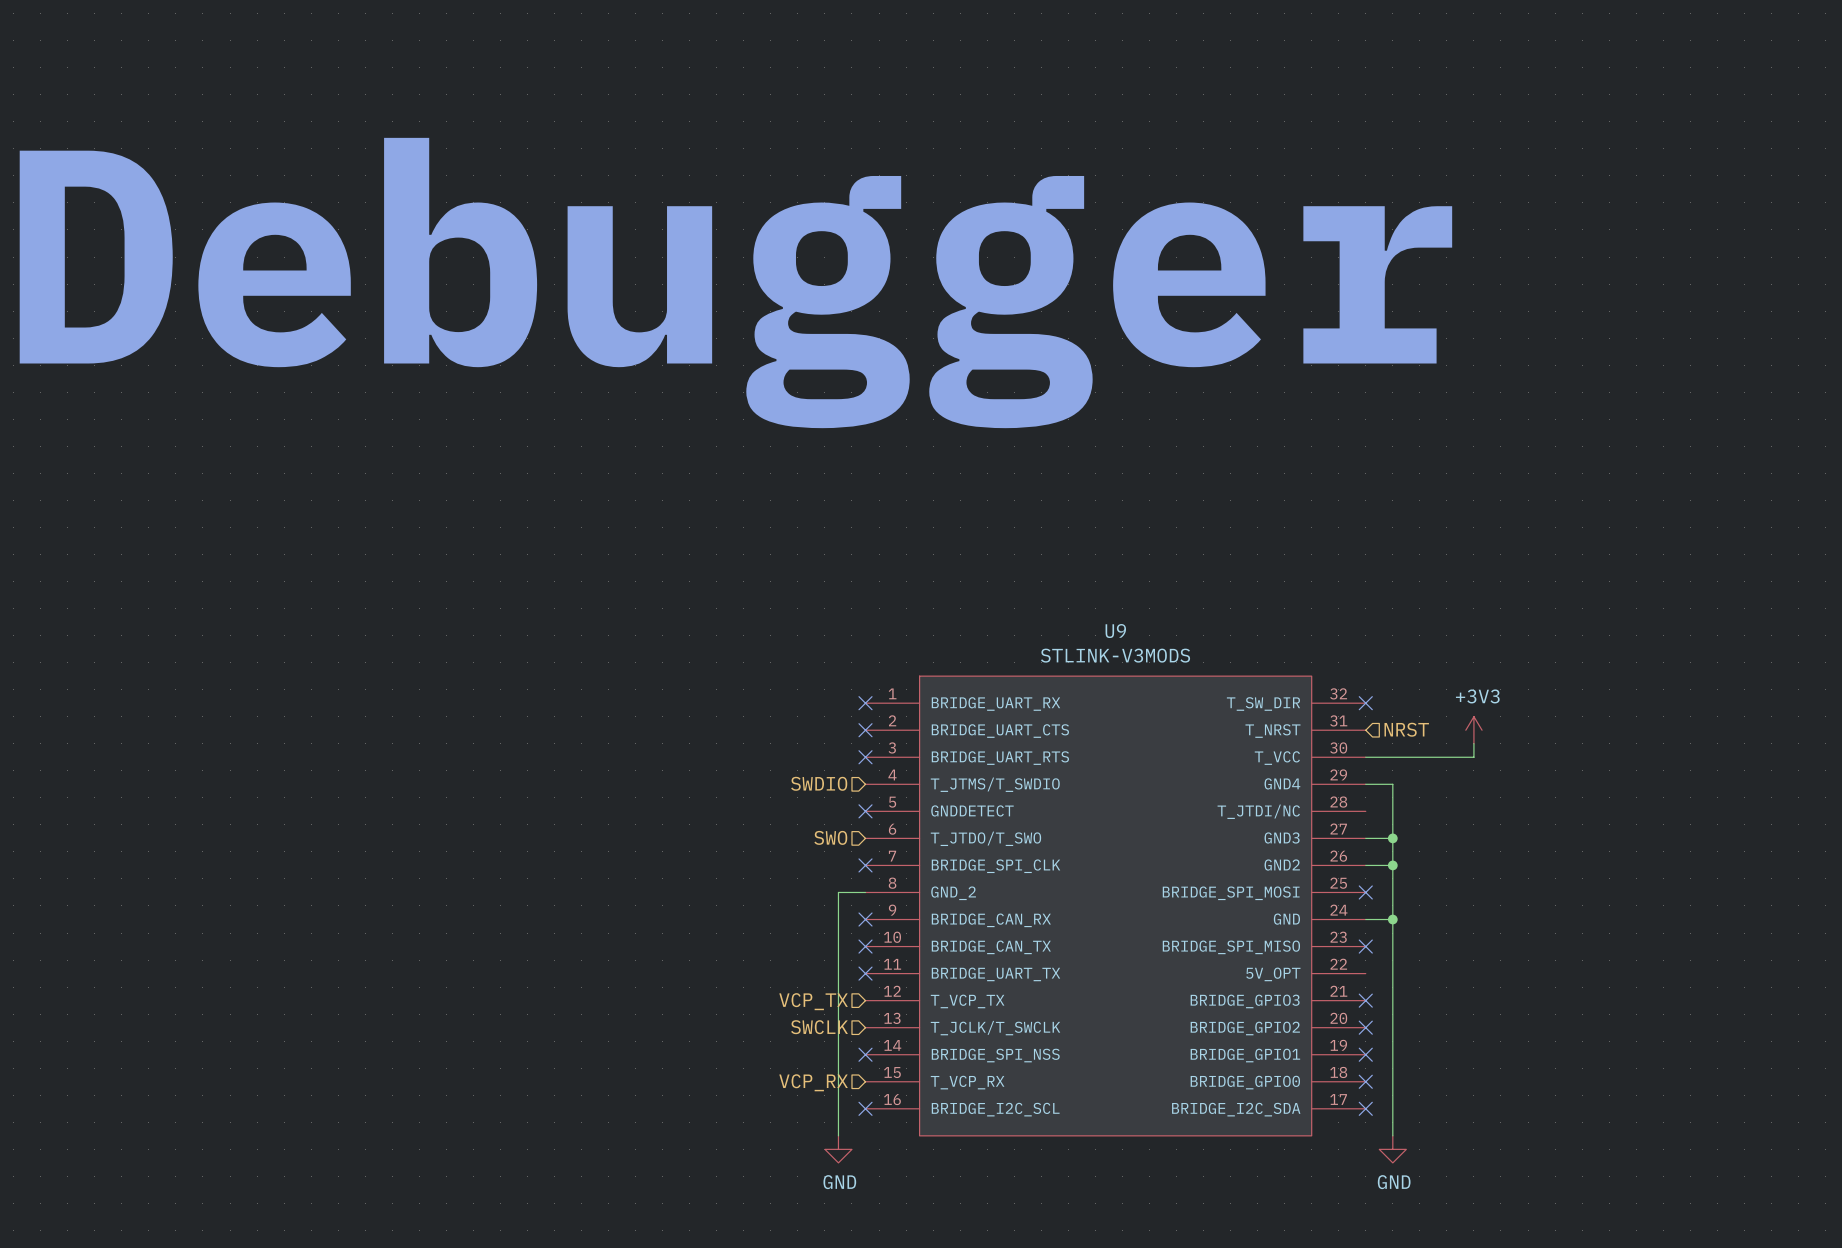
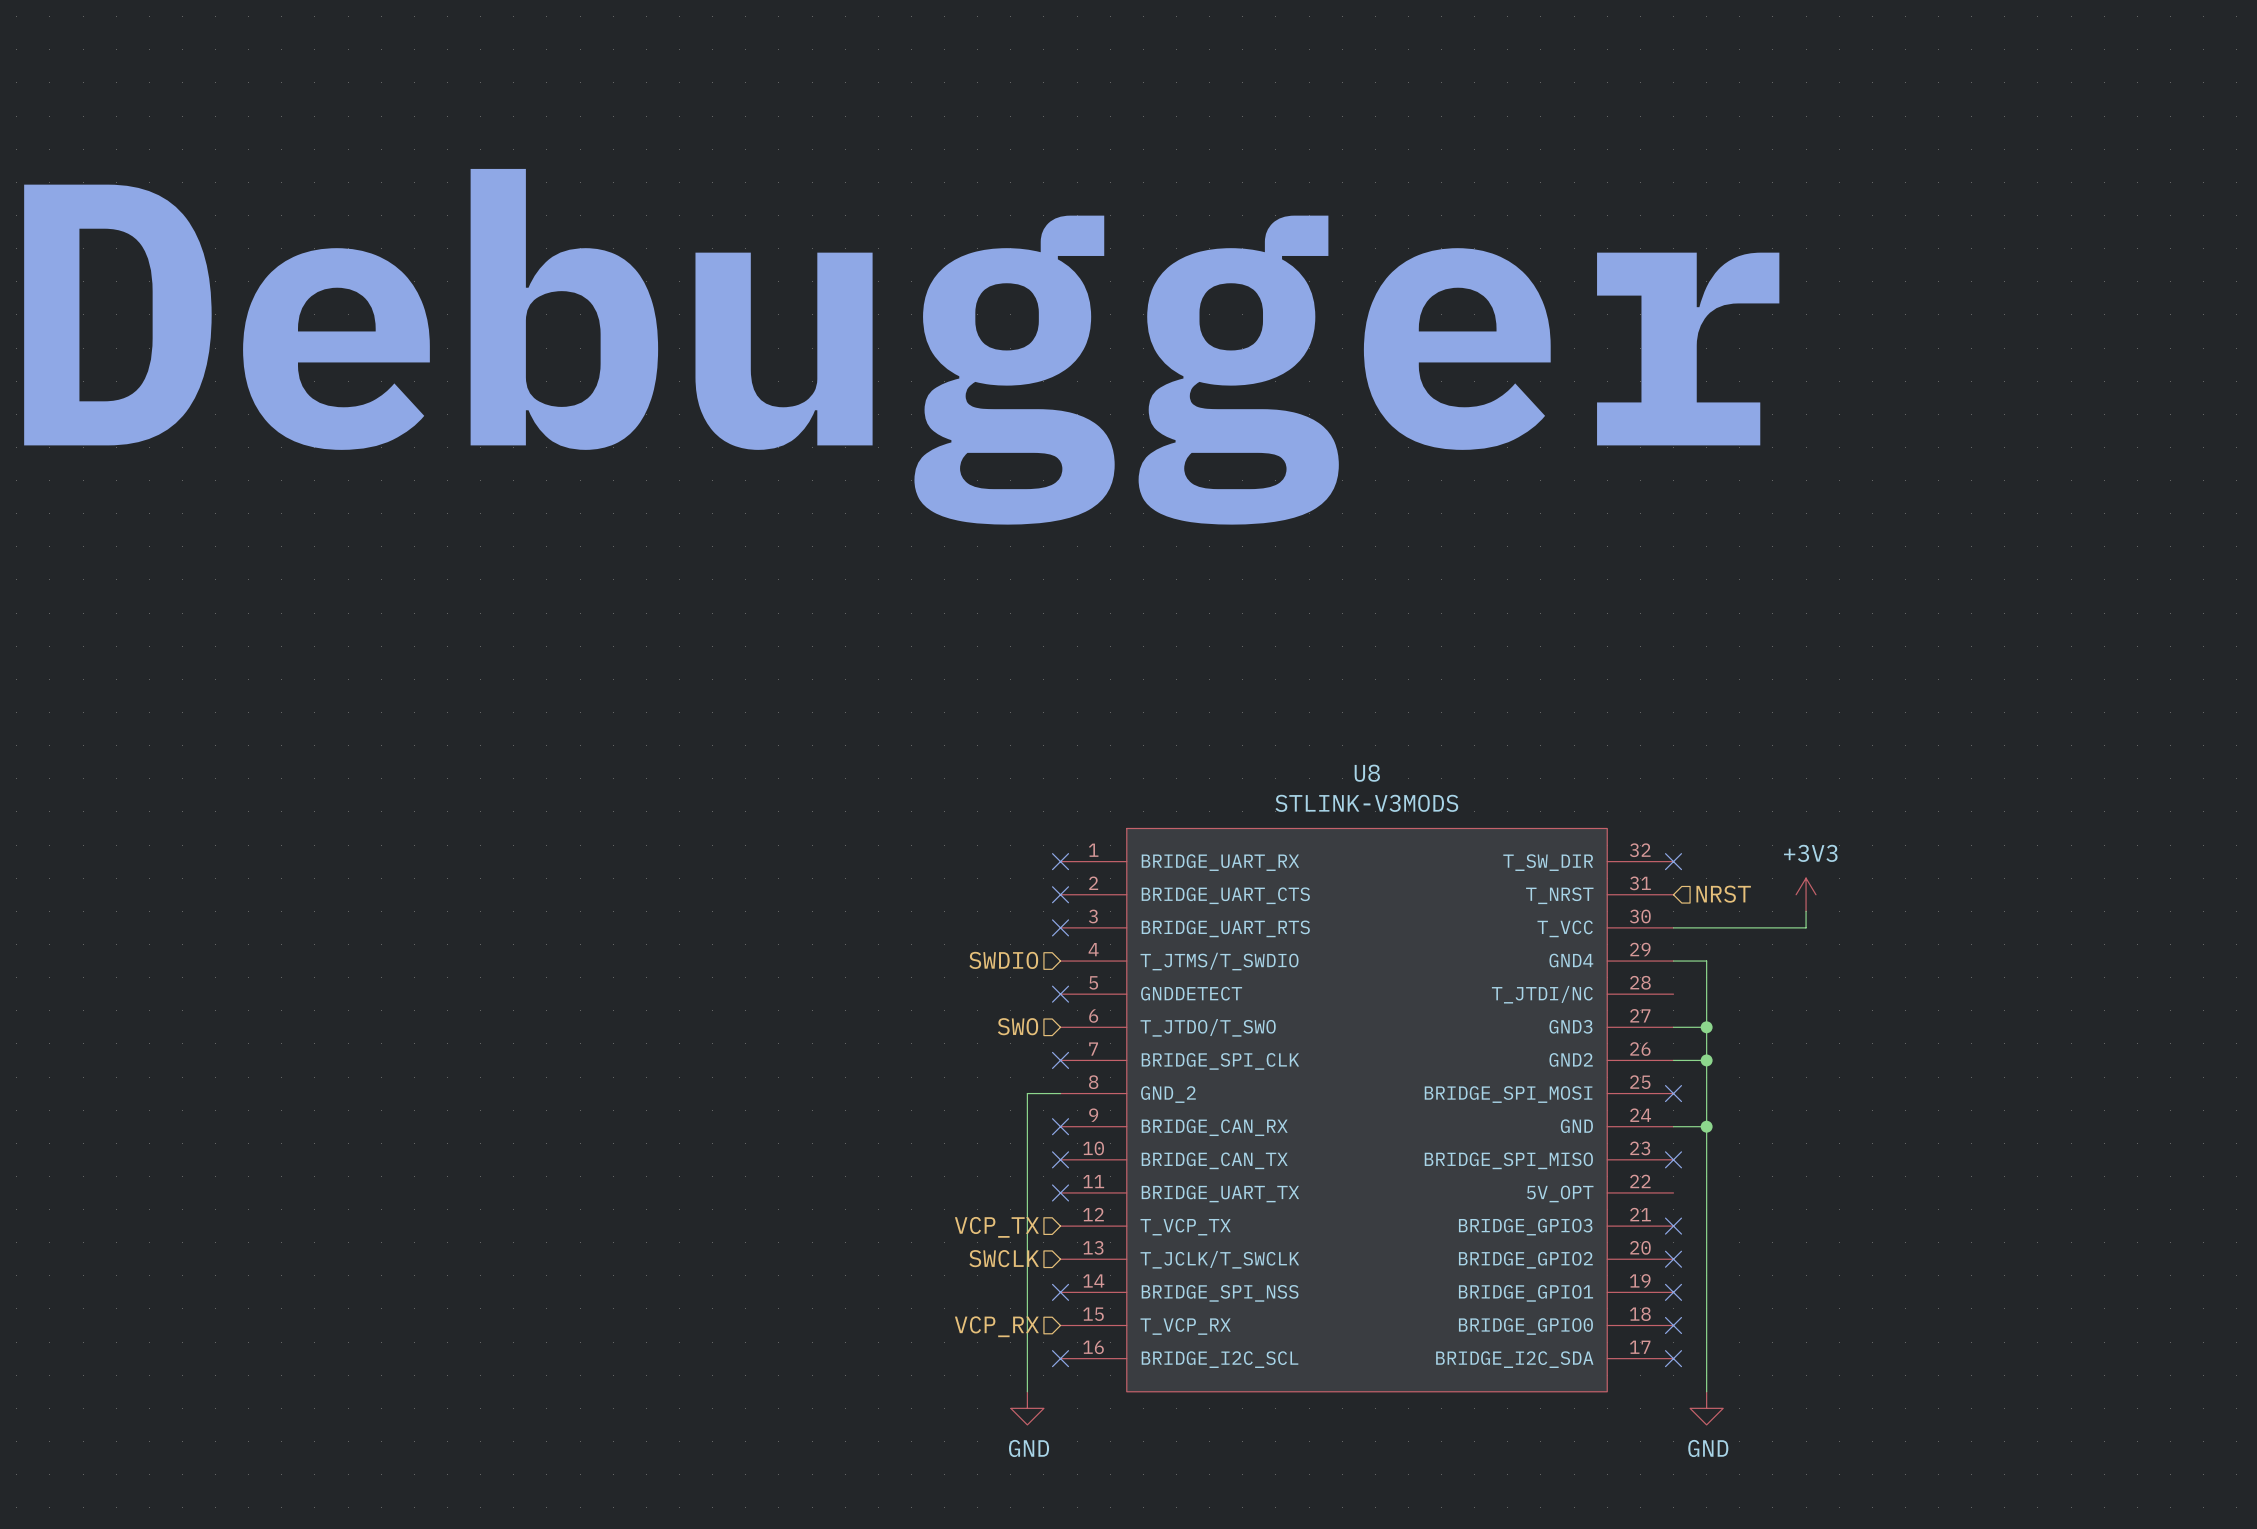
U9 name: U9 (1115, 631) -> U8 (1367, 773)

